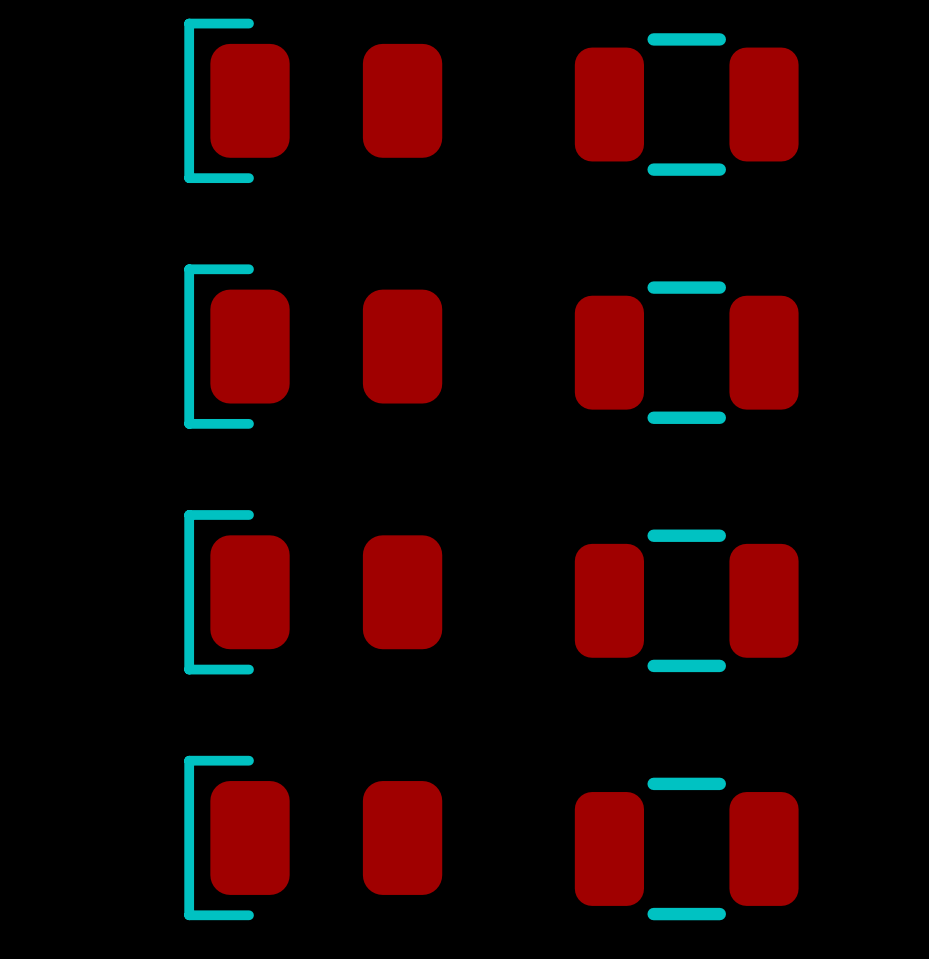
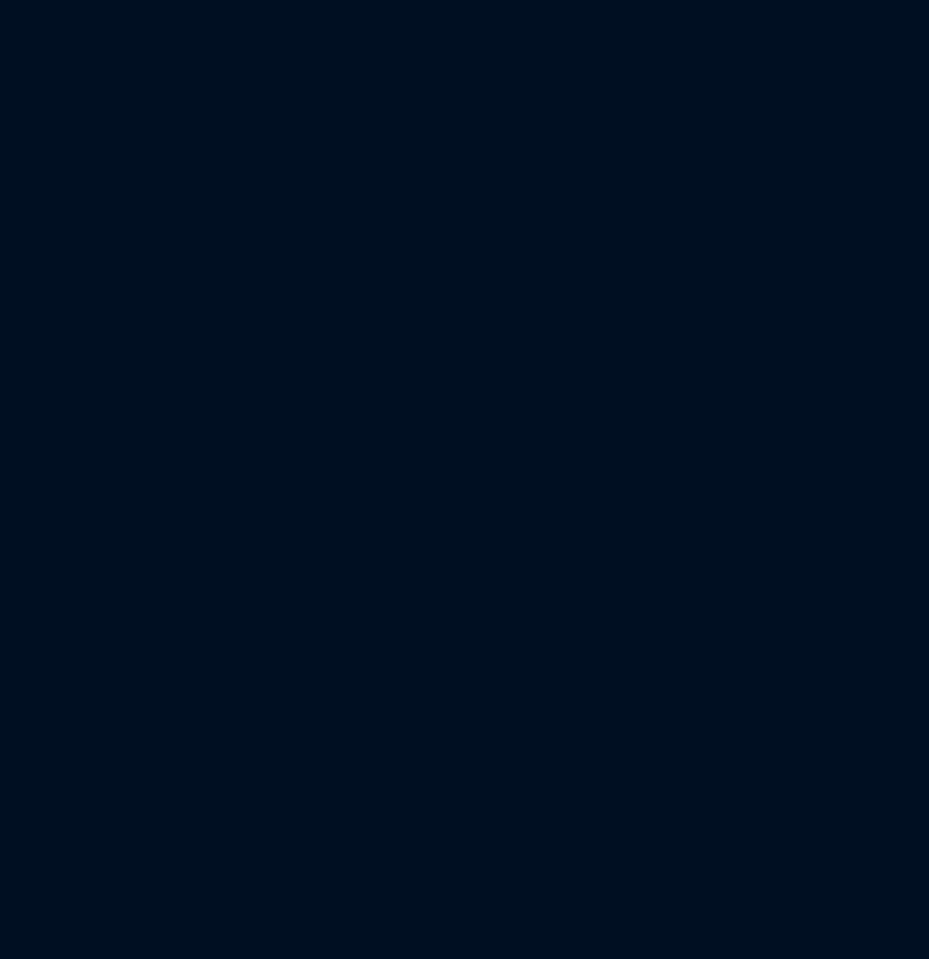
part: (313, 100) -> none
part: (686, 104) -> none
part: (313, 346) -> none
part: (686, 352) -> none
part: (313, 592) -> none
part: (686, 600) -> none
part: (313, 837) -> none
part: (686, 848) -> none

